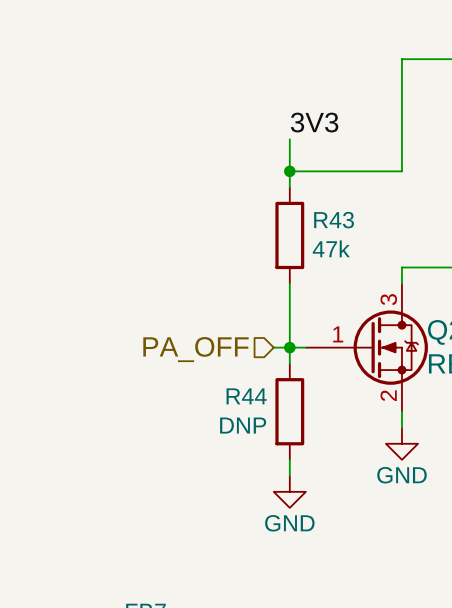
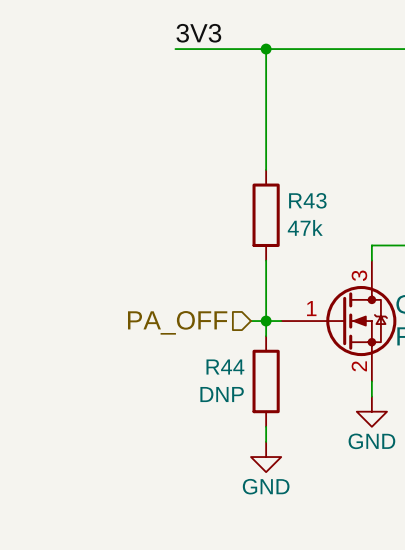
wire: none -> (266, 49) (266, 124)
junction: none -> (266, 49)
wire: (401, 59) (401, 171) (289, 171) -> (371, 49) (175, 49)
label position: 3V3 (314, 122) -> 3V3 (198, 33)
junction: (289, 171) -> none

